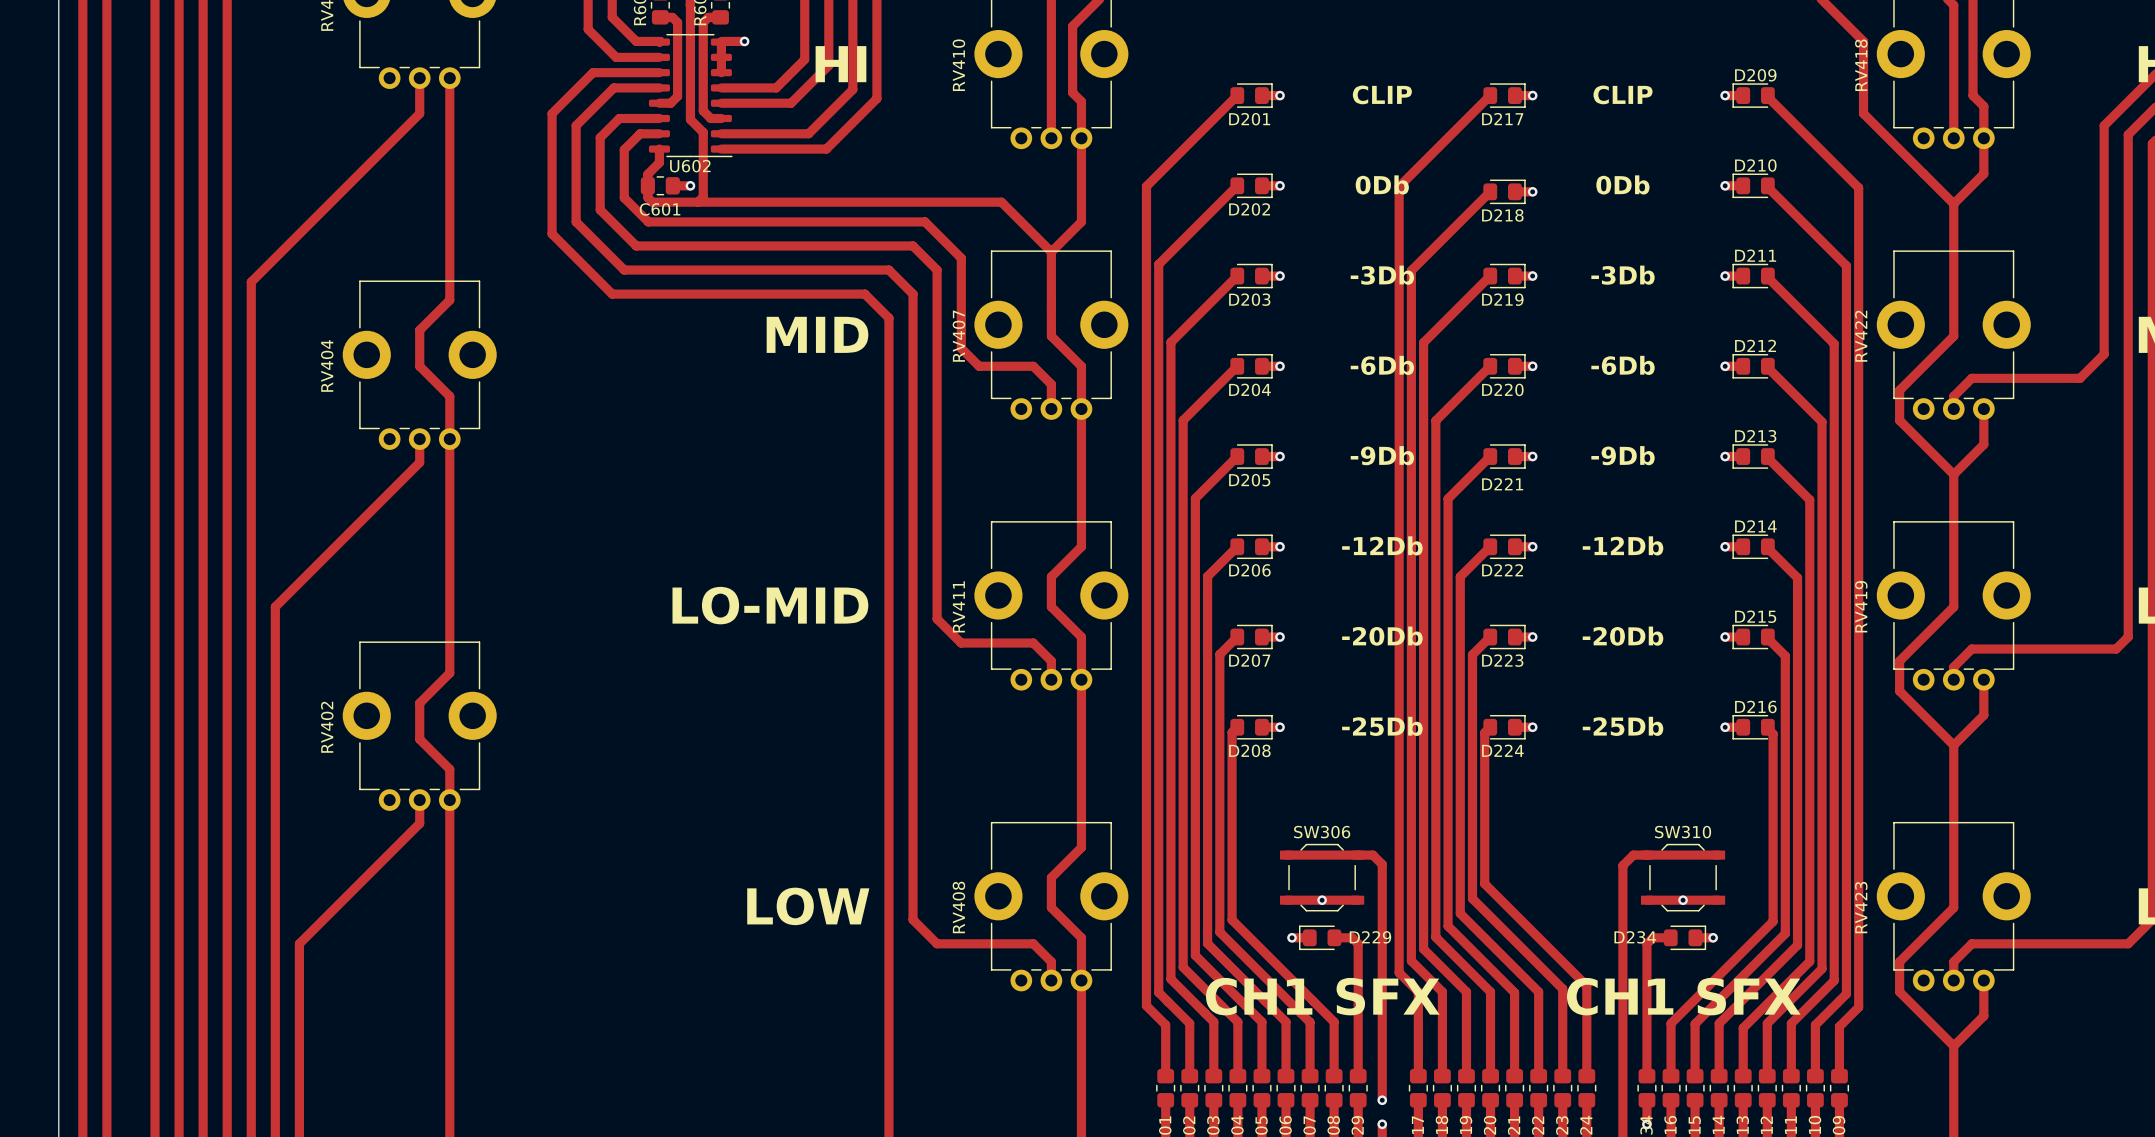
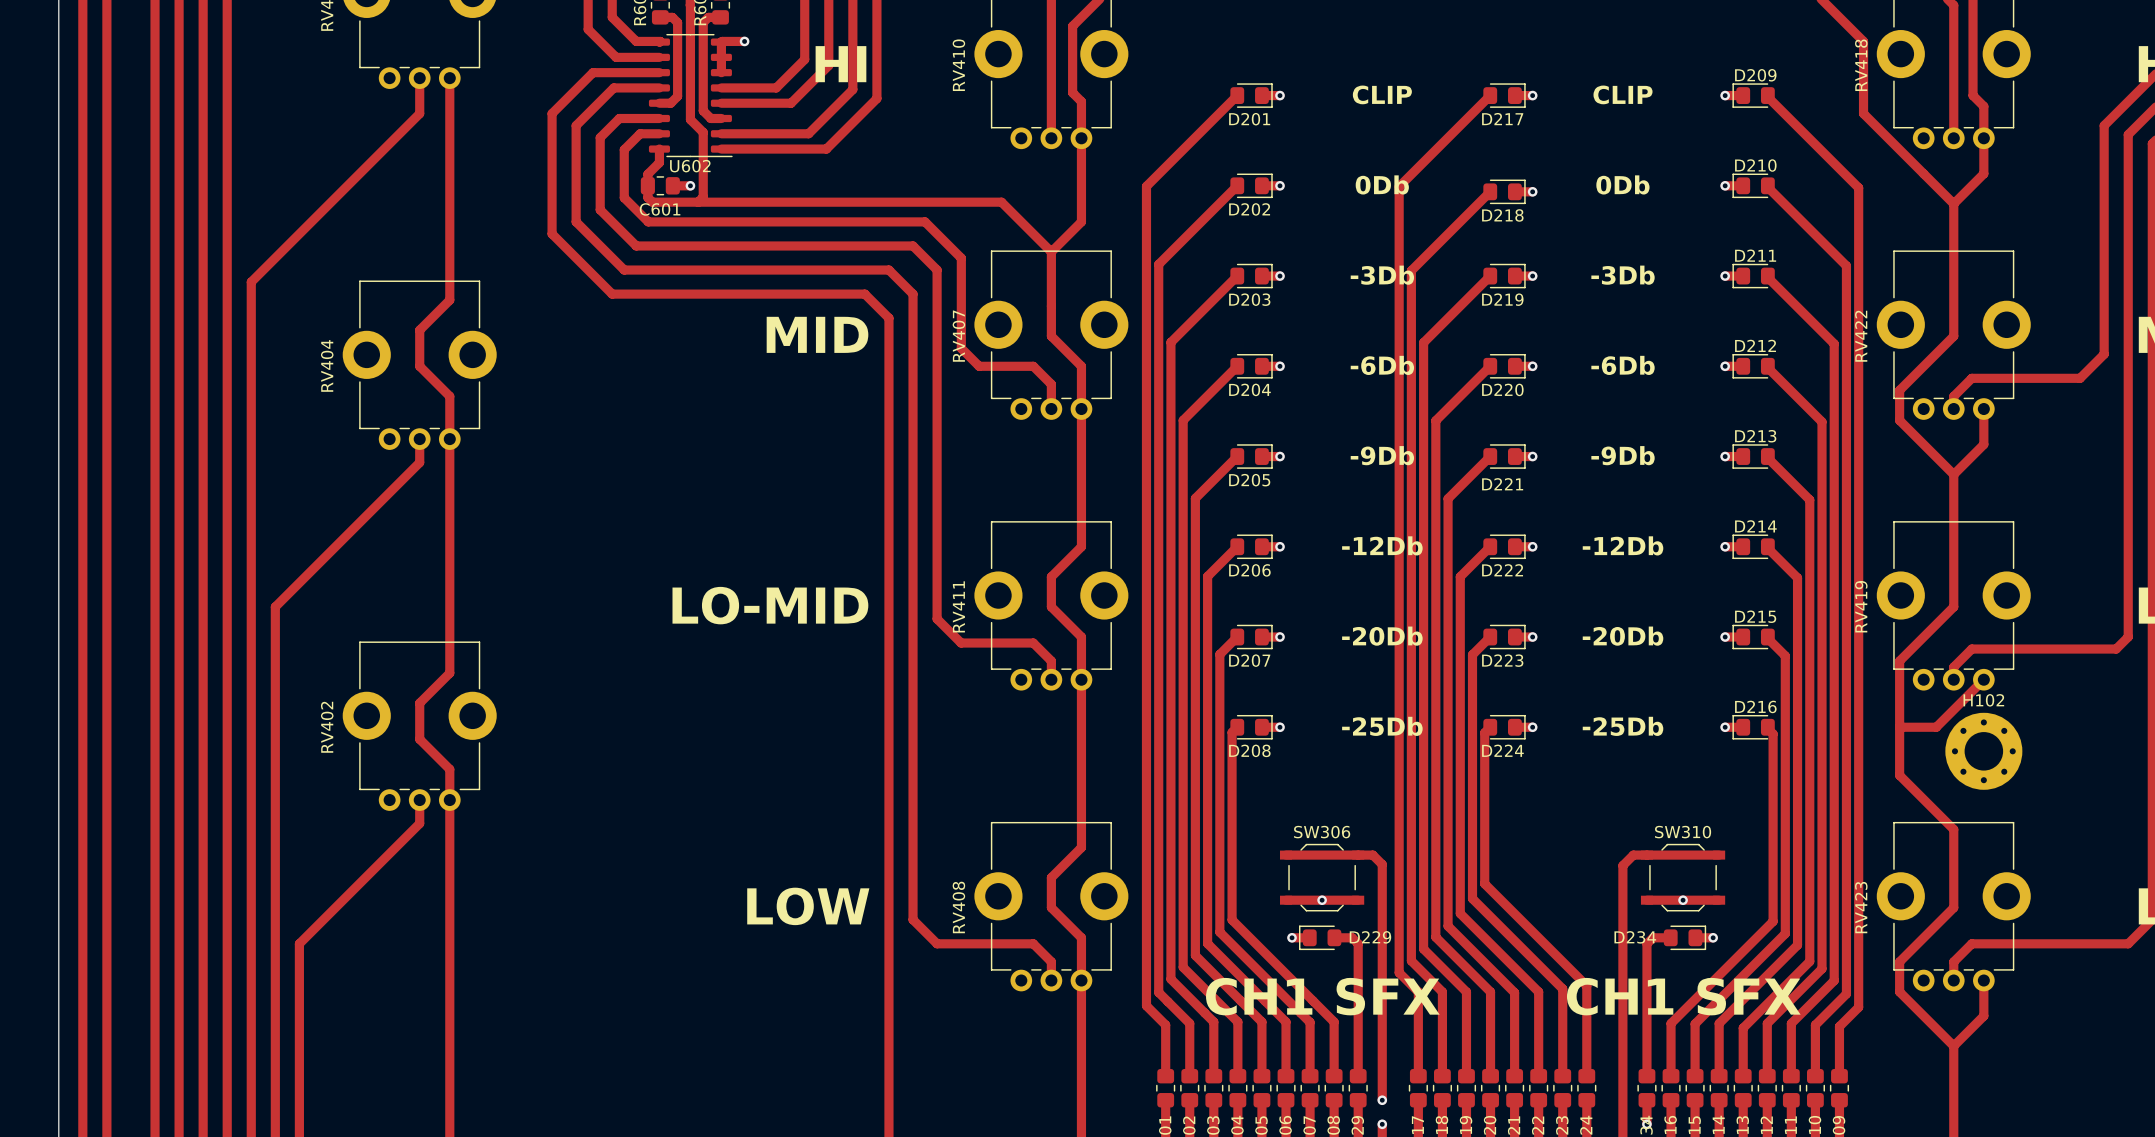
track: (1983, 679) (1983, 715) (1953, 745) -> (1983, 679) (1936, 727) (1899, 727)
track: (1899, 691) (1953, 745) -> none
track: (1953, 745) (1953, 829) -> (1899, 691) (1899, 775) (1953, 829)
H102: none -> (1983, 751)

